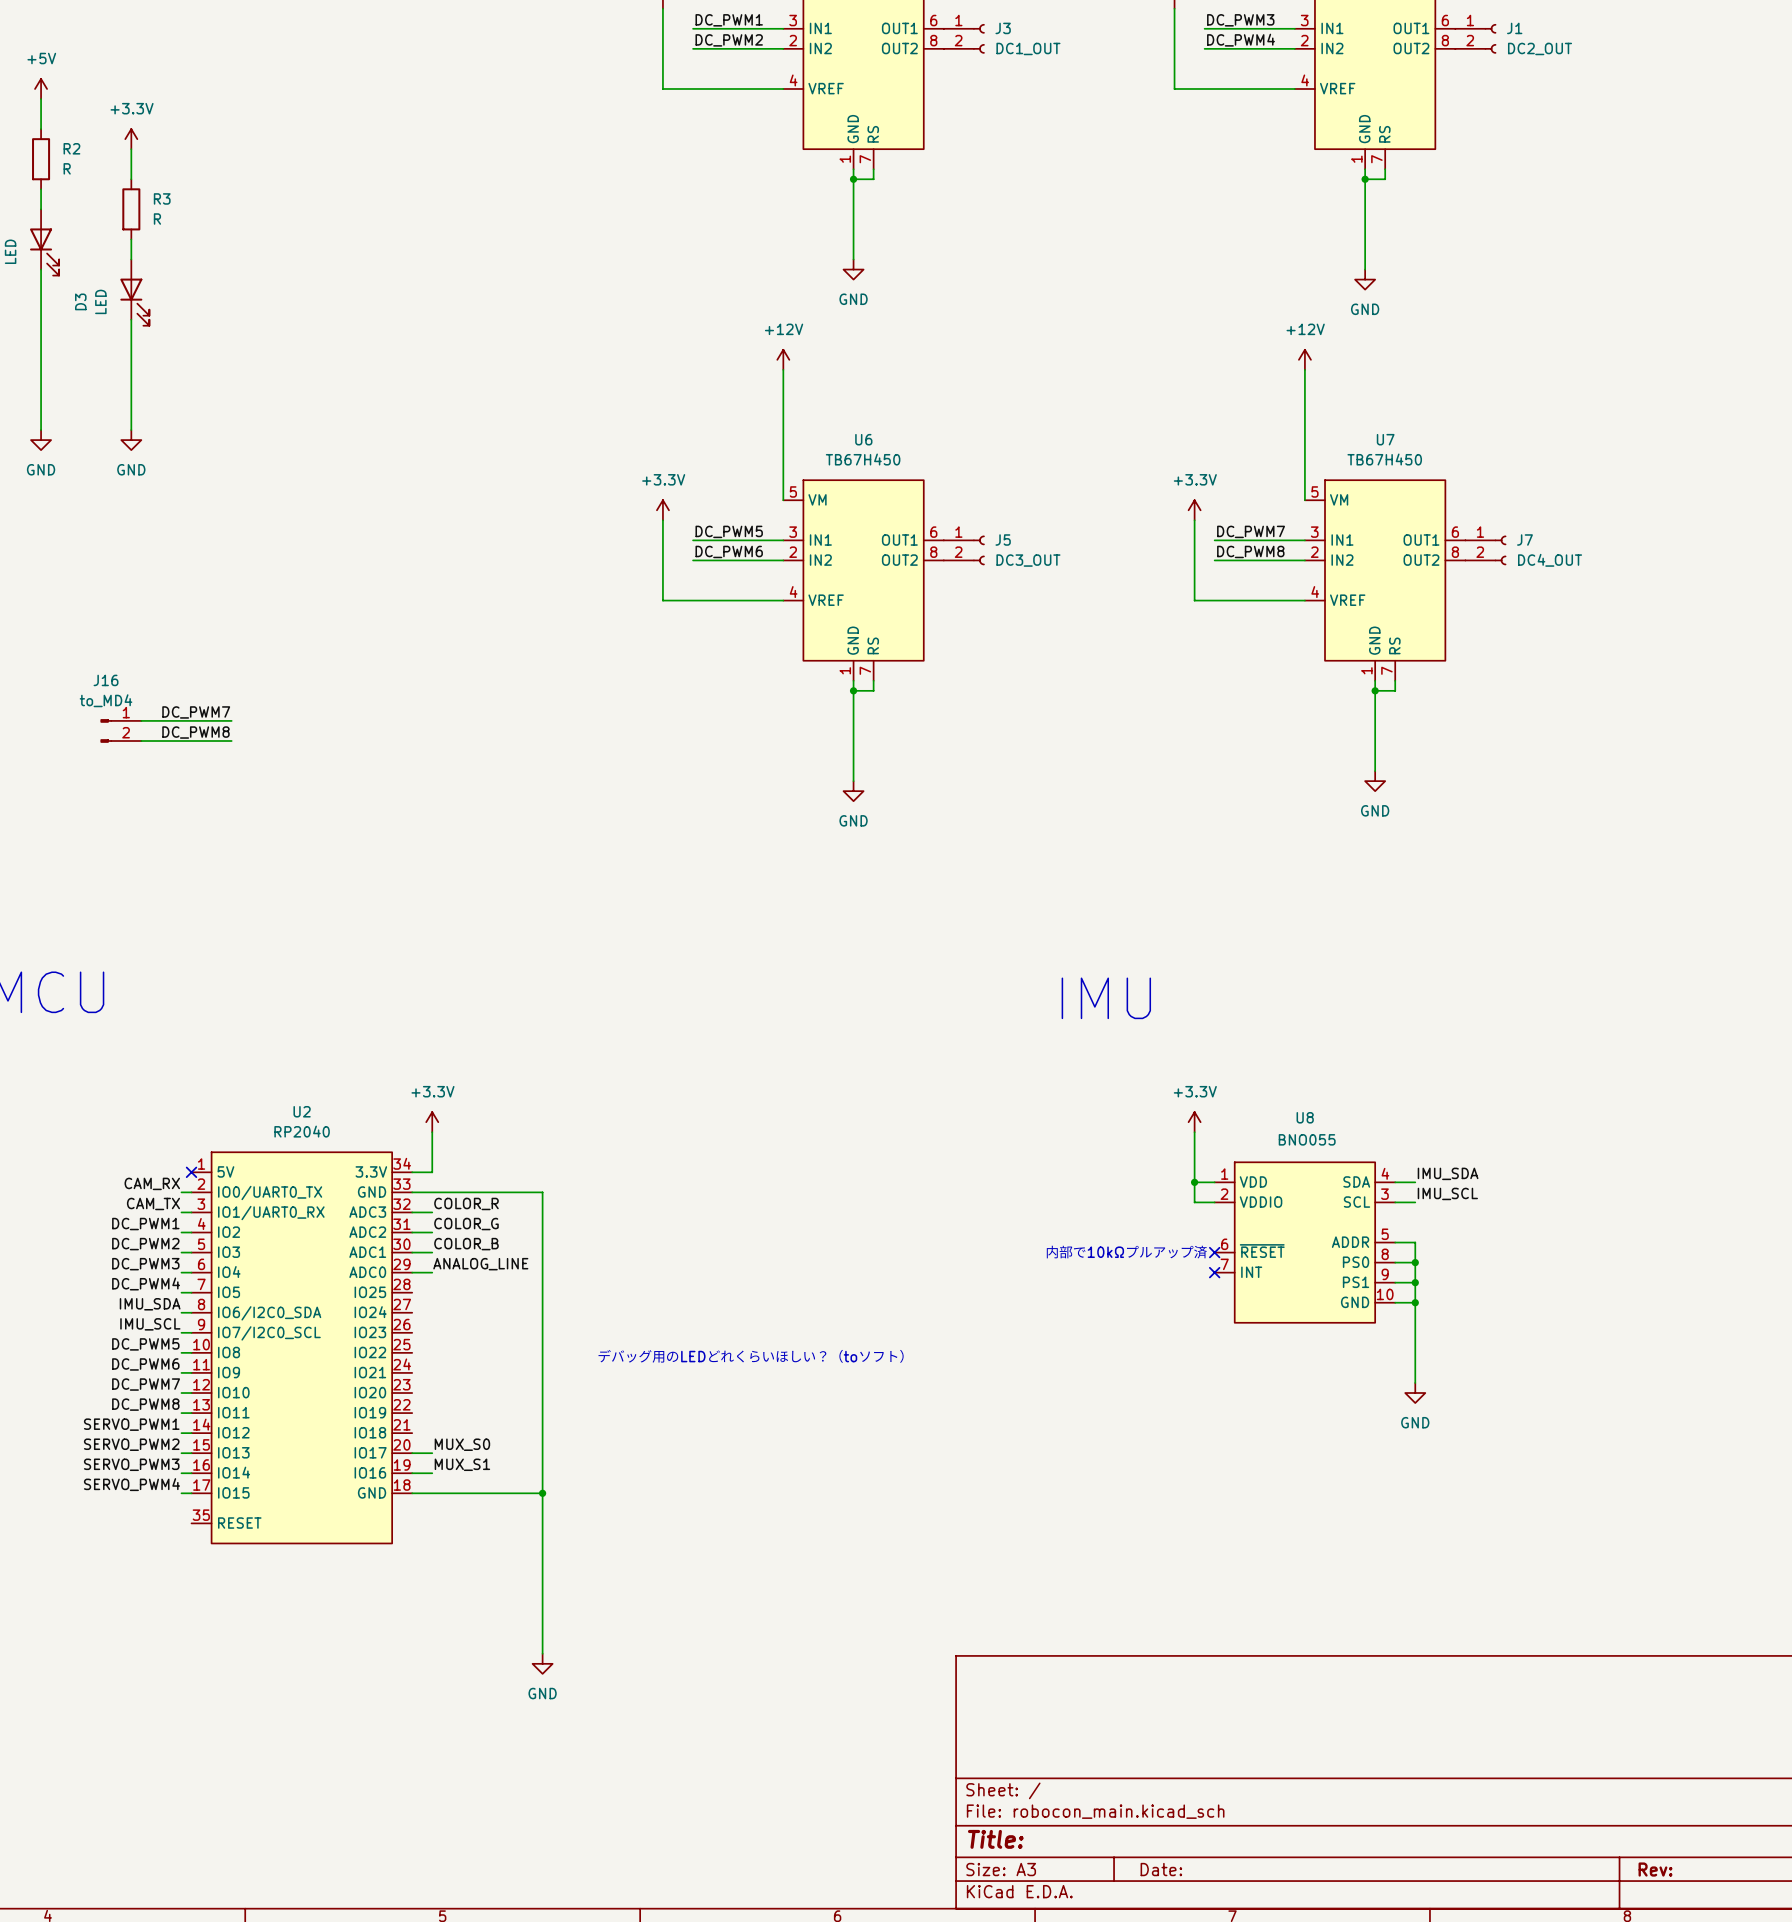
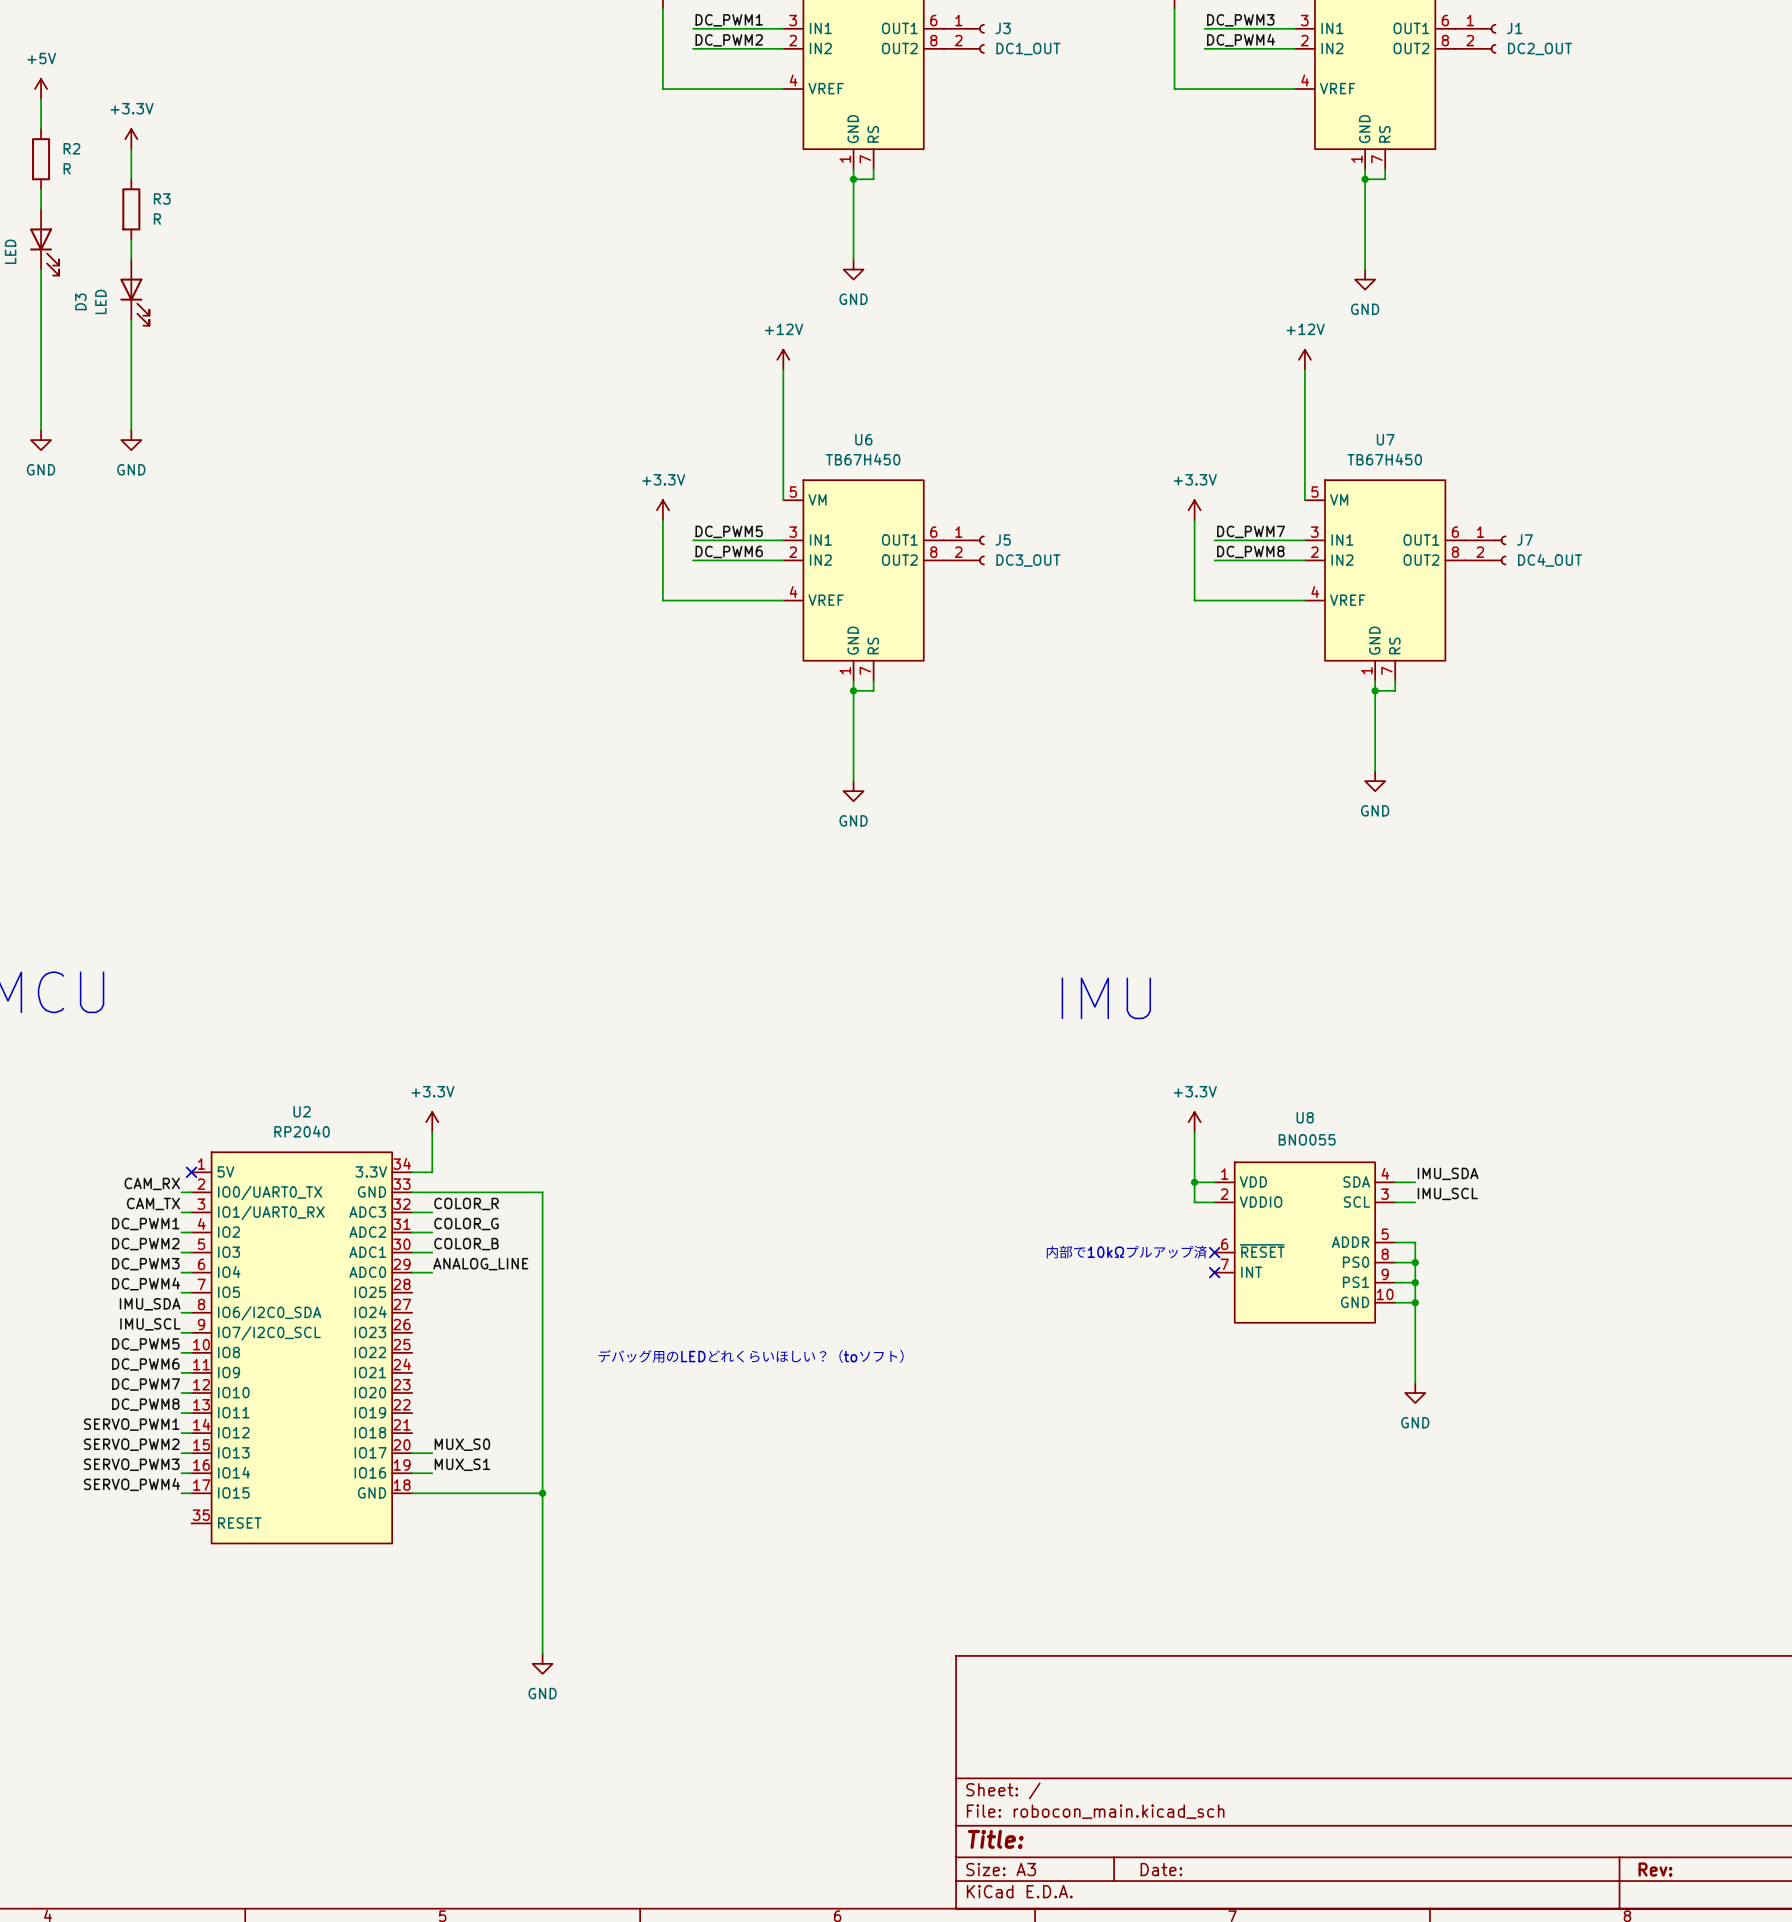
label: DC_PWM7 (196, 712) -> none
wire: (141, 720) (231, 720) -> none
J16: to_MD4 (121, 730) -> none
label: DC_PWM8 (195, 732) -> none
wire: (141, 741) (231, 741) -> none

